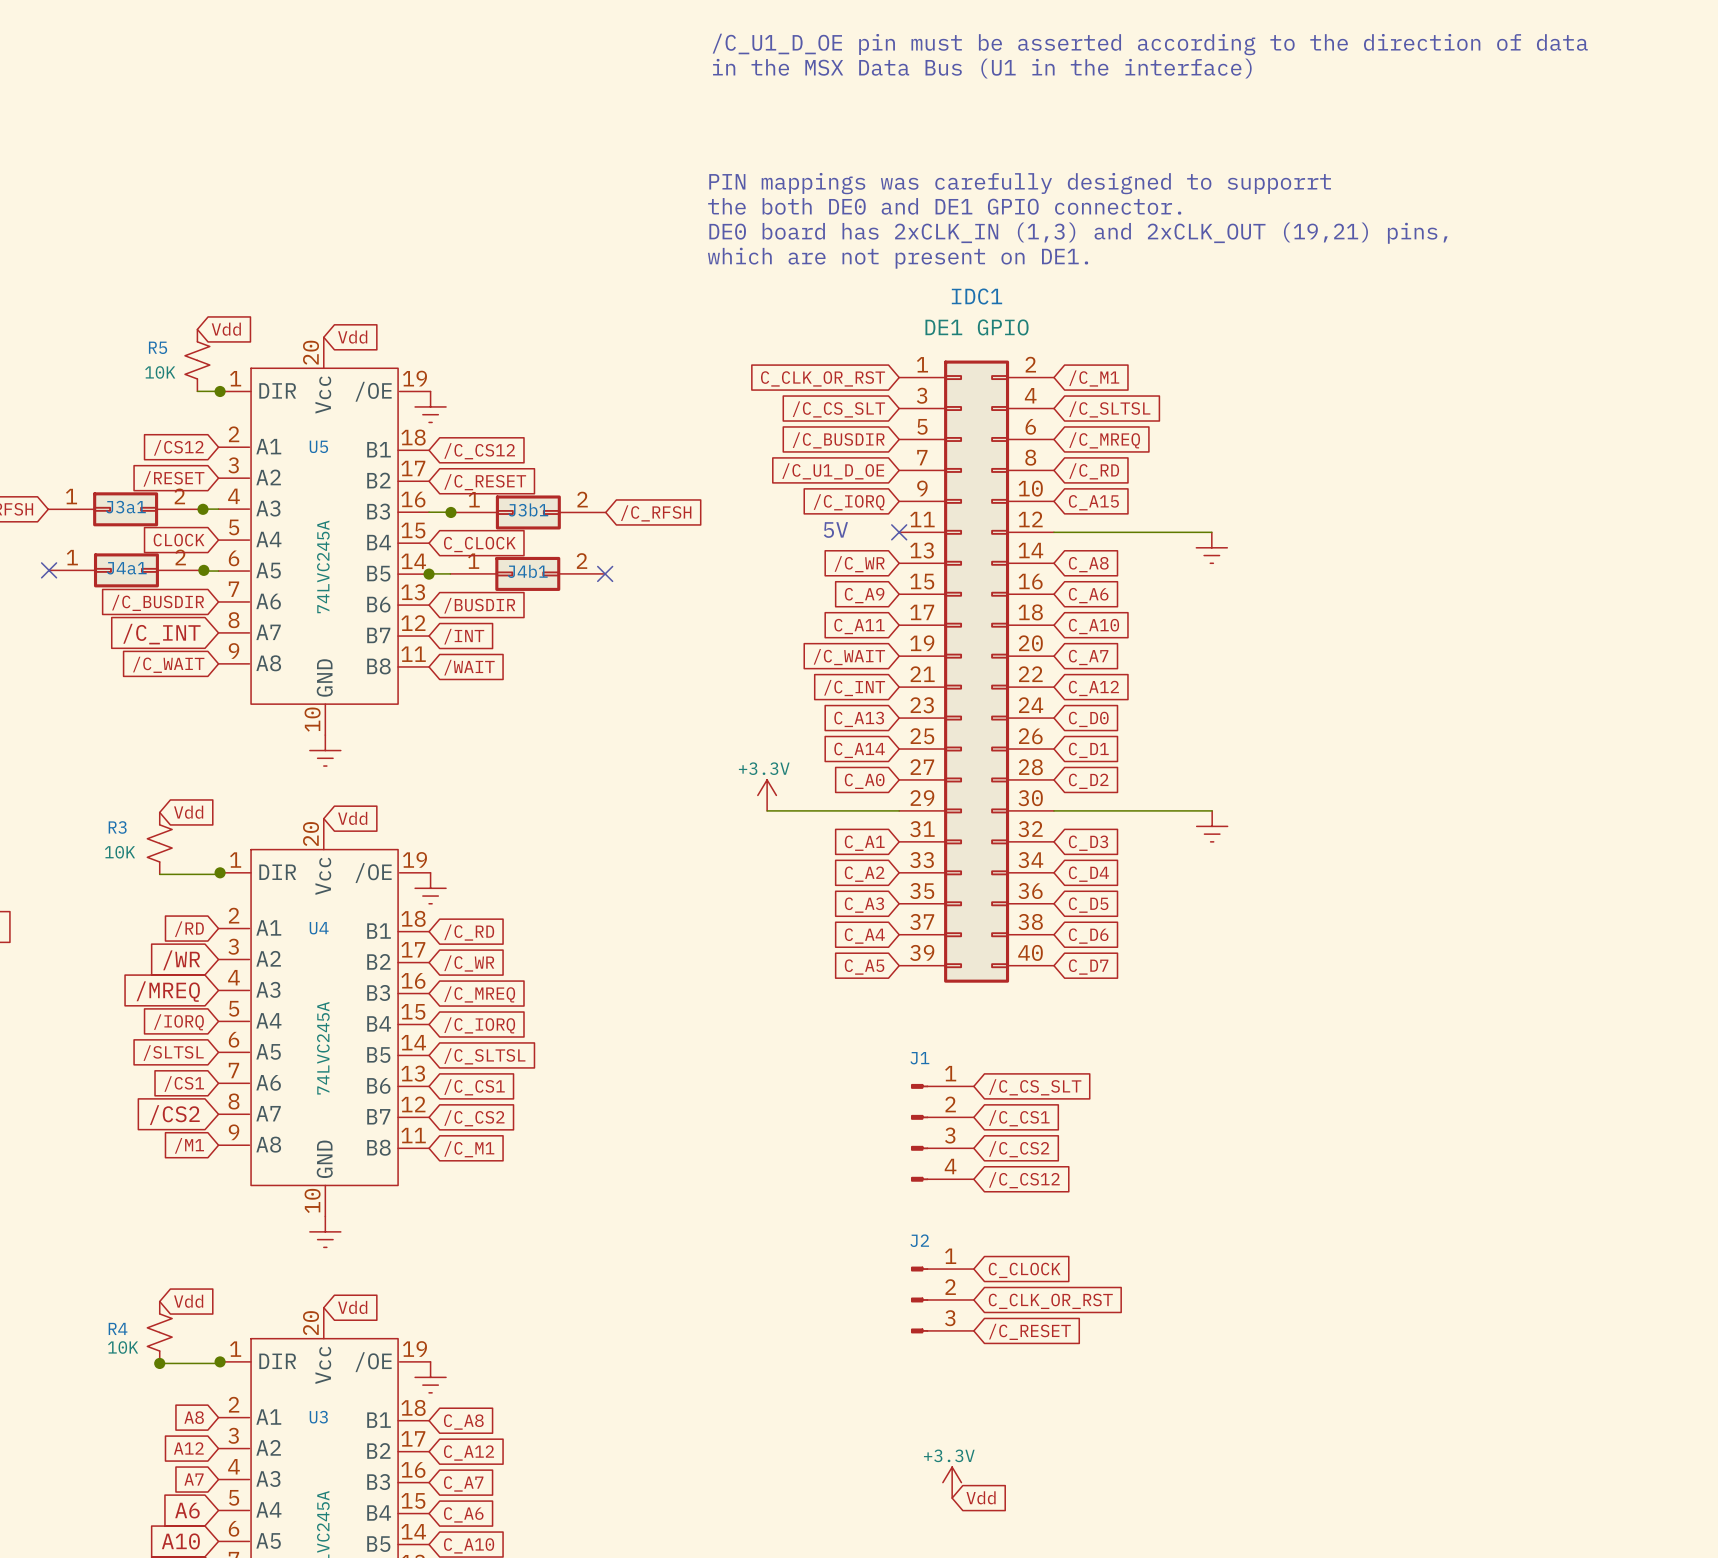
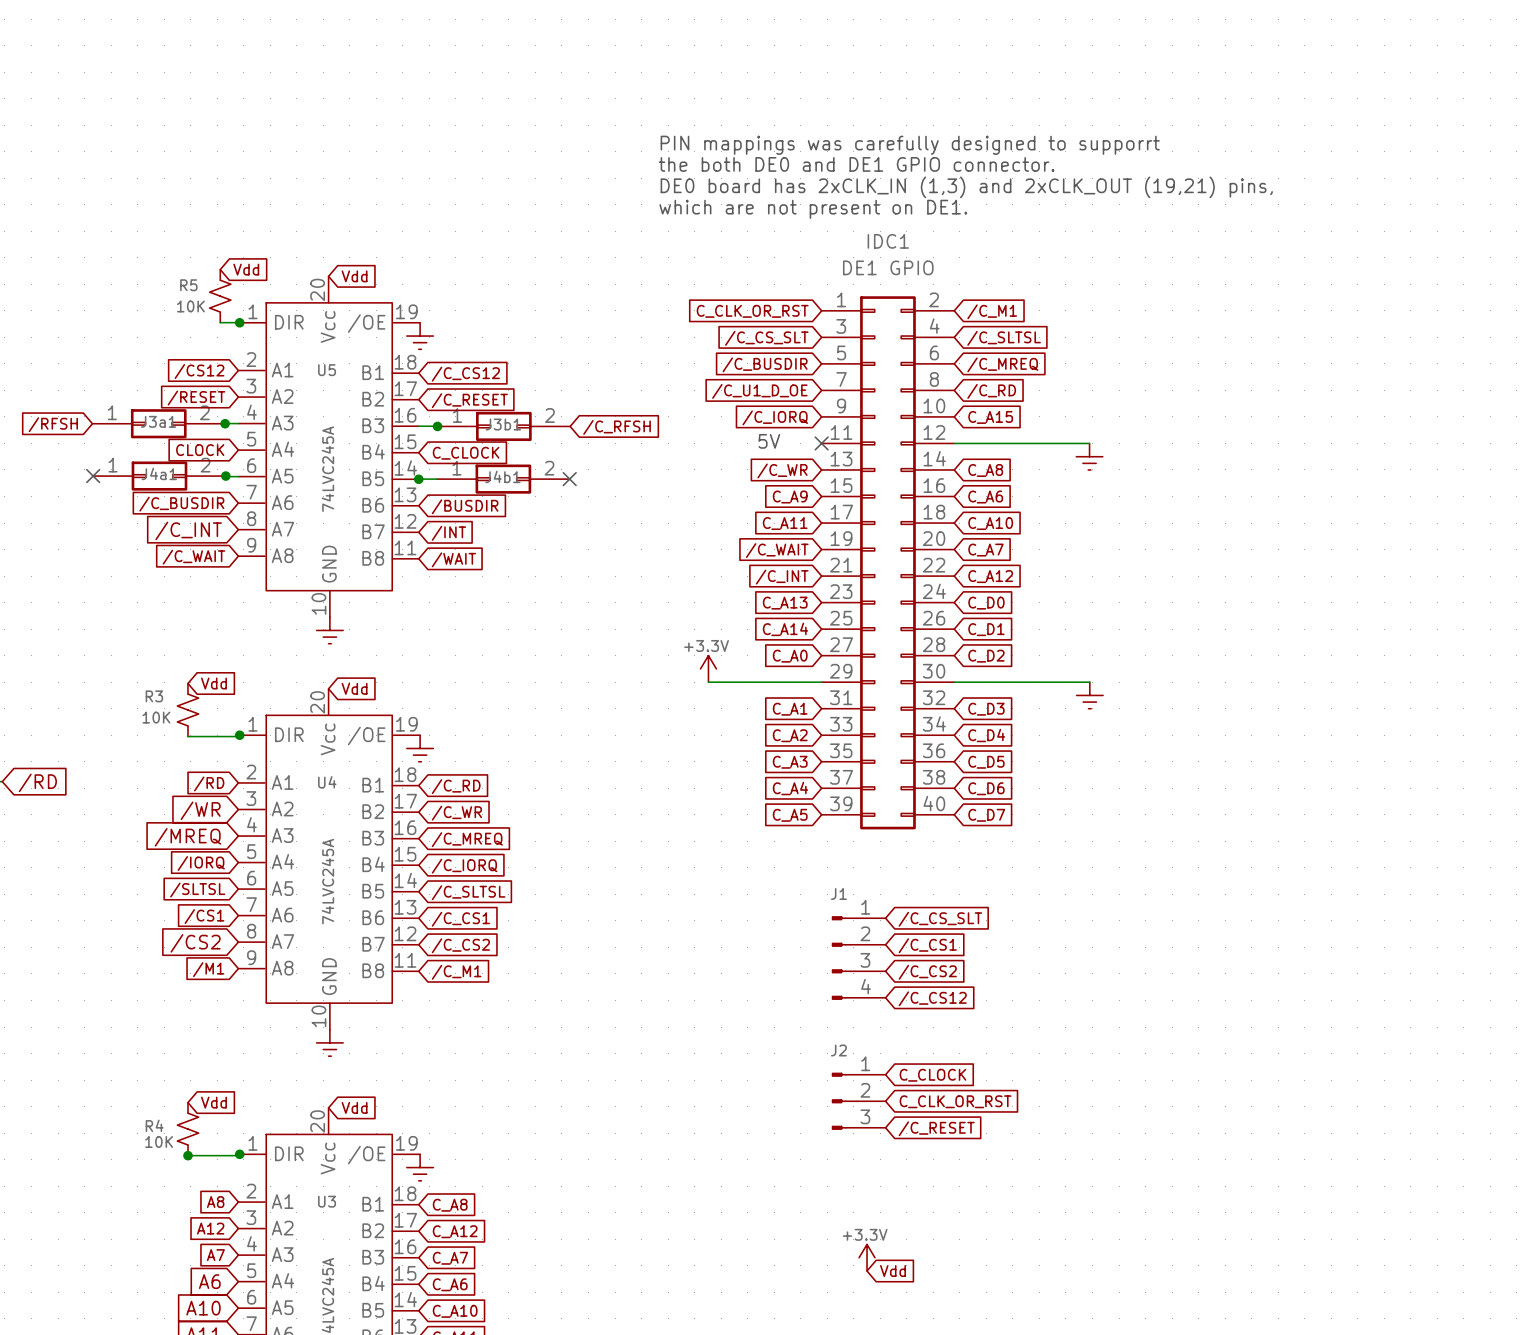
text: /C_U1_D_OE pin must be asserted according to the direction of data (1150, 44) -> none
text: in the MSX Data Bus (U1 in the interface) (982, 68) -> none

